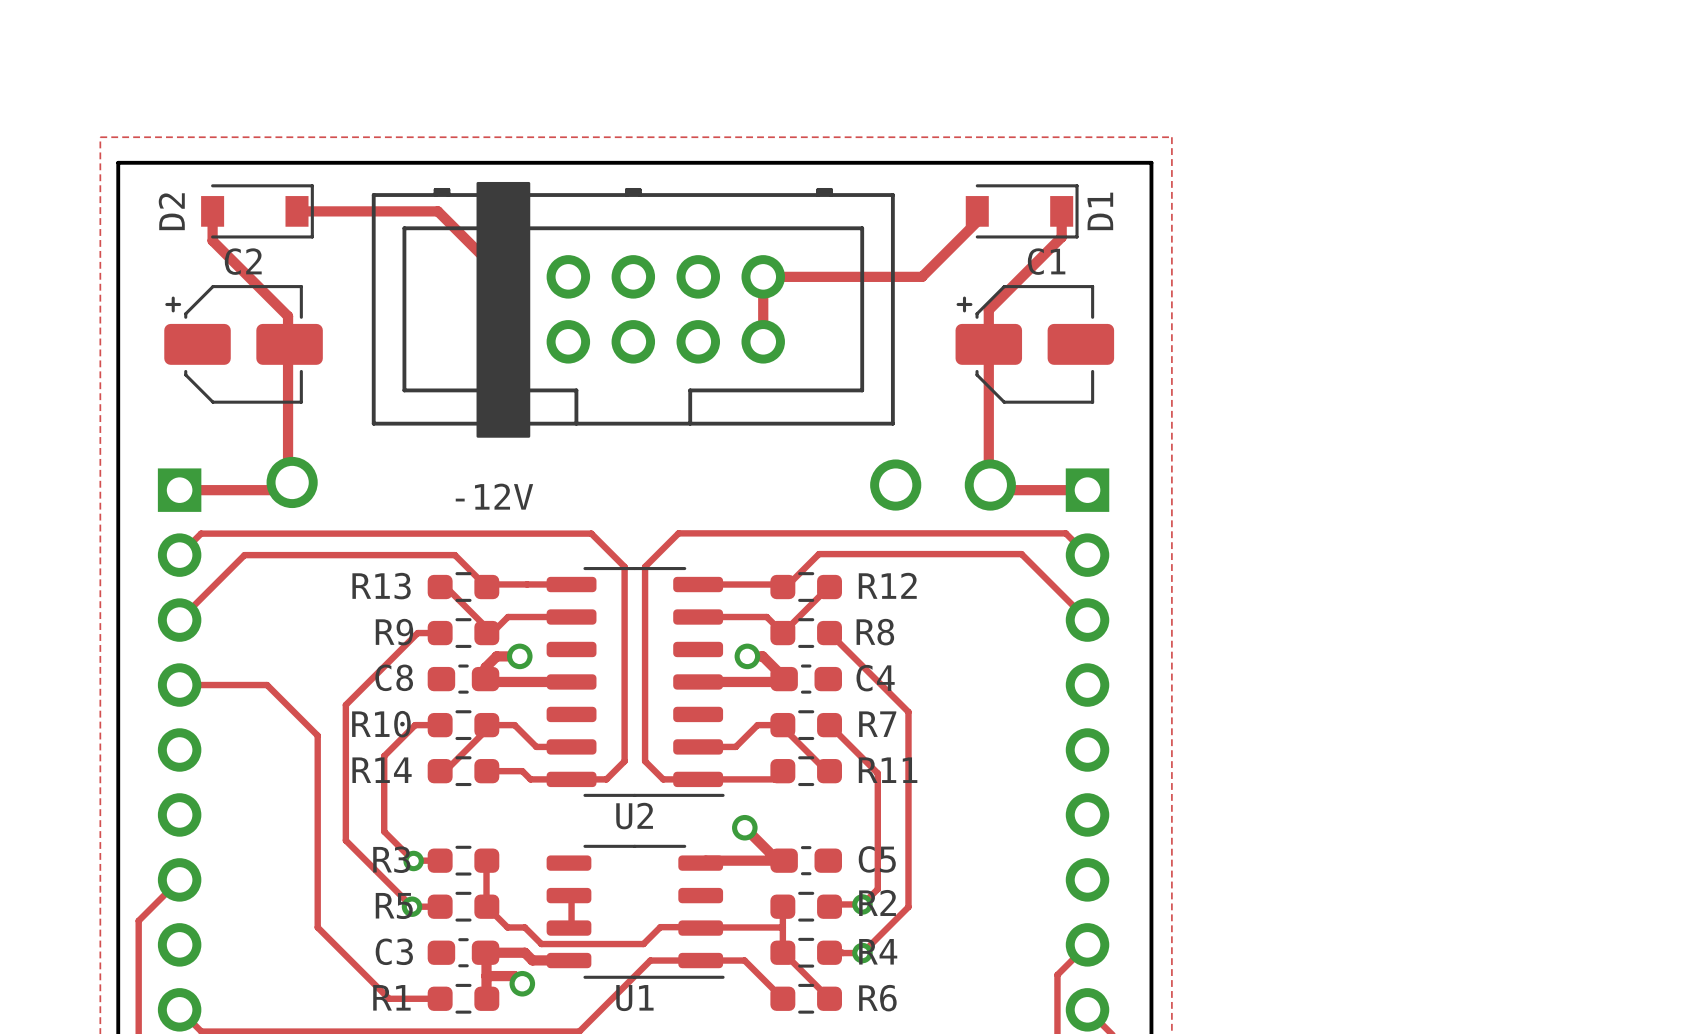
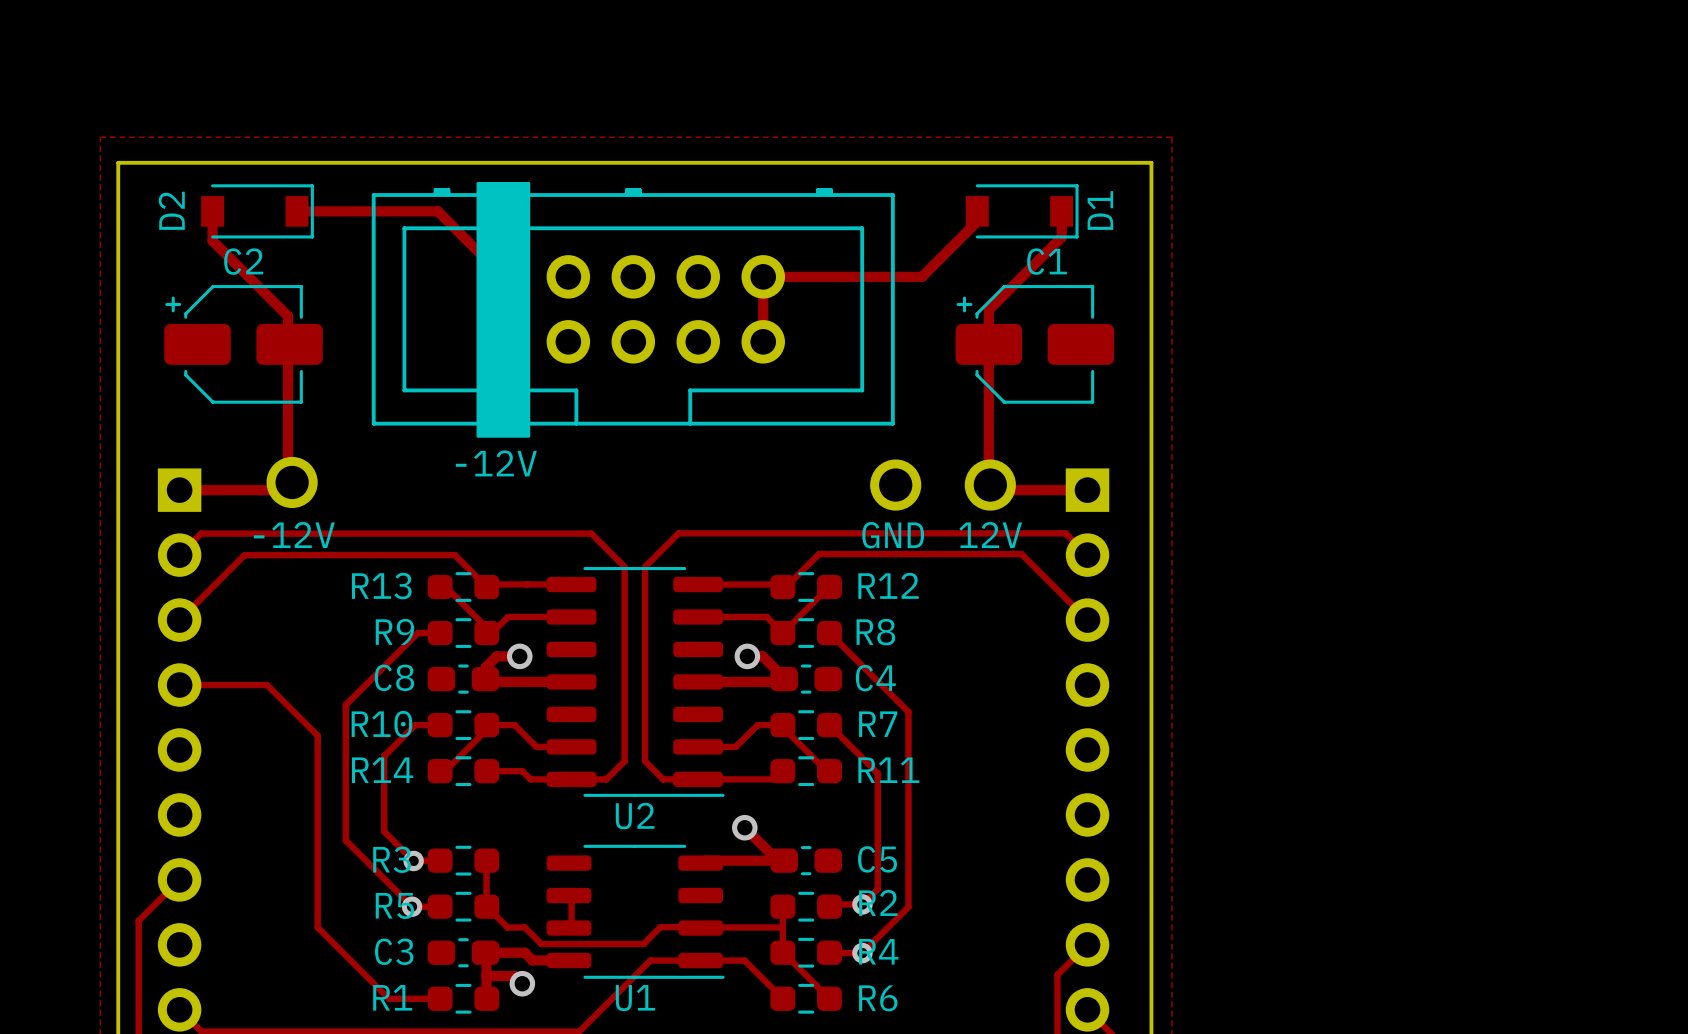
part text position: -12V (494, 496) -> -12V (496, 463)
text: none -> -12V (294, 535)
text: none -> GND (893, 535)
text: none -> 12V (990, 535)

